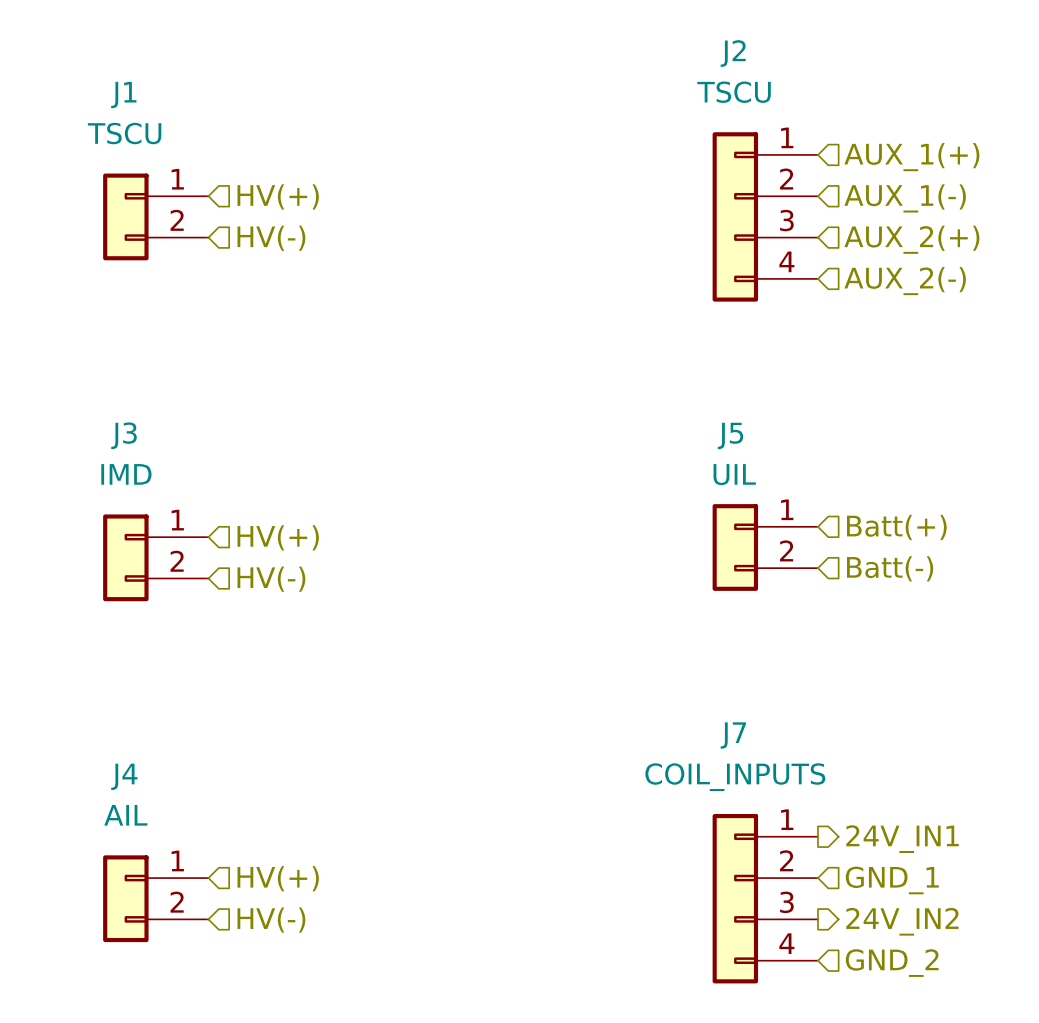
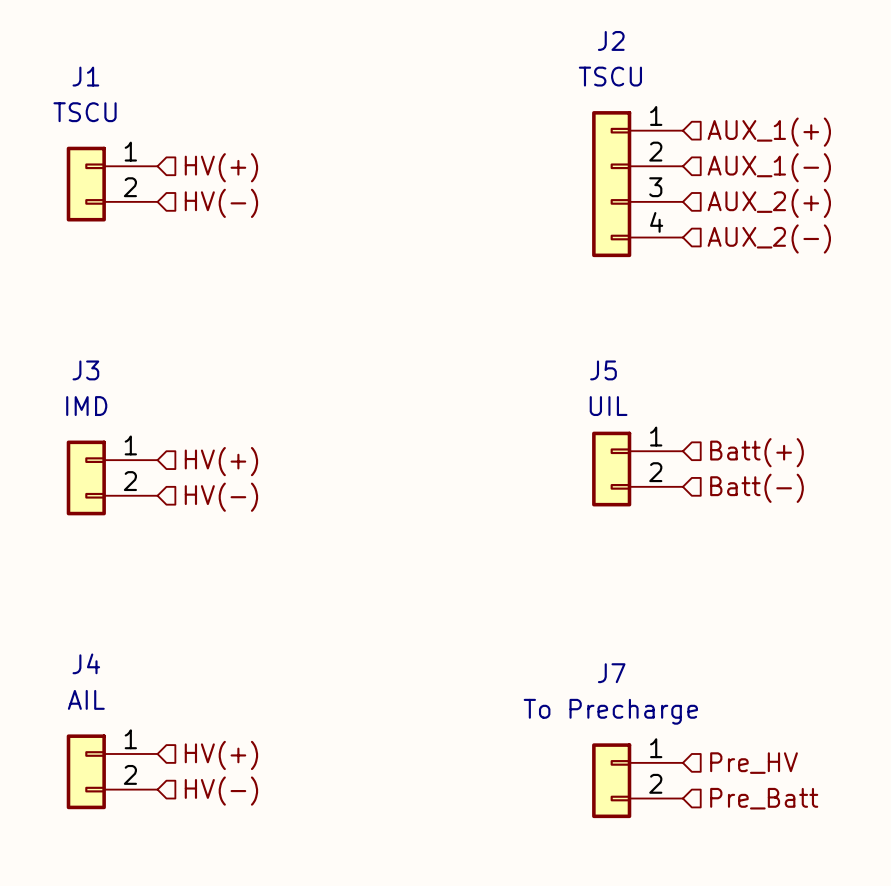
J7 name position: J7 (733, 735) -> J7 (611, 673)
J7 value: COIL_INPUTS (735, 777) -> To Precharge (610, 711)
J7 symbol: [712, 814, 818, 984] -> [592, 743, 683, 819]
hierarchical label: 24V_IN1 (902, 839) -> none
hierarchical label: GND_1 (892, 880) -> Pre_HV (754, 763)
hierarchical label shape: output (902, 921) -> input (764, 798)
hierarchical label: 24V_IN2 (902, 921) -> Pre_Batt (764, 798)
hierarchical label: GND_2 (892, 963) -> none

